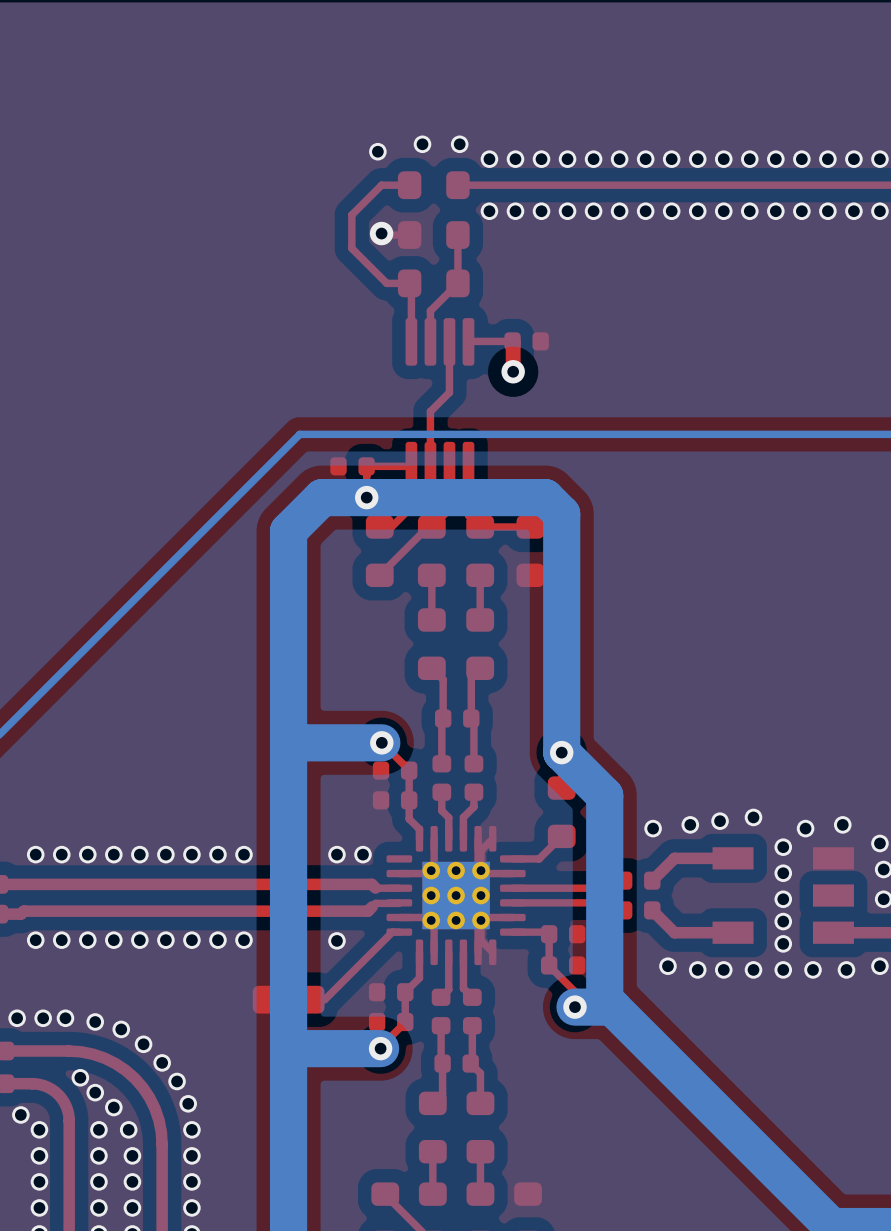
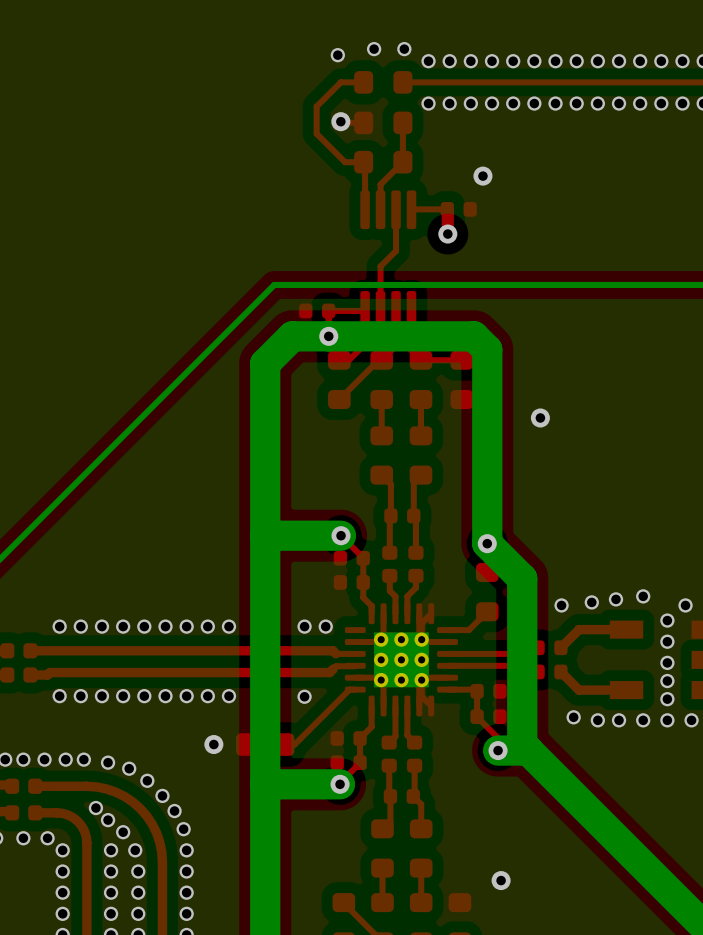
via: none -> (482, 176)
via: none -> (540, 417)
via: none -> (213, 744)
via: none -> (501, 880)

